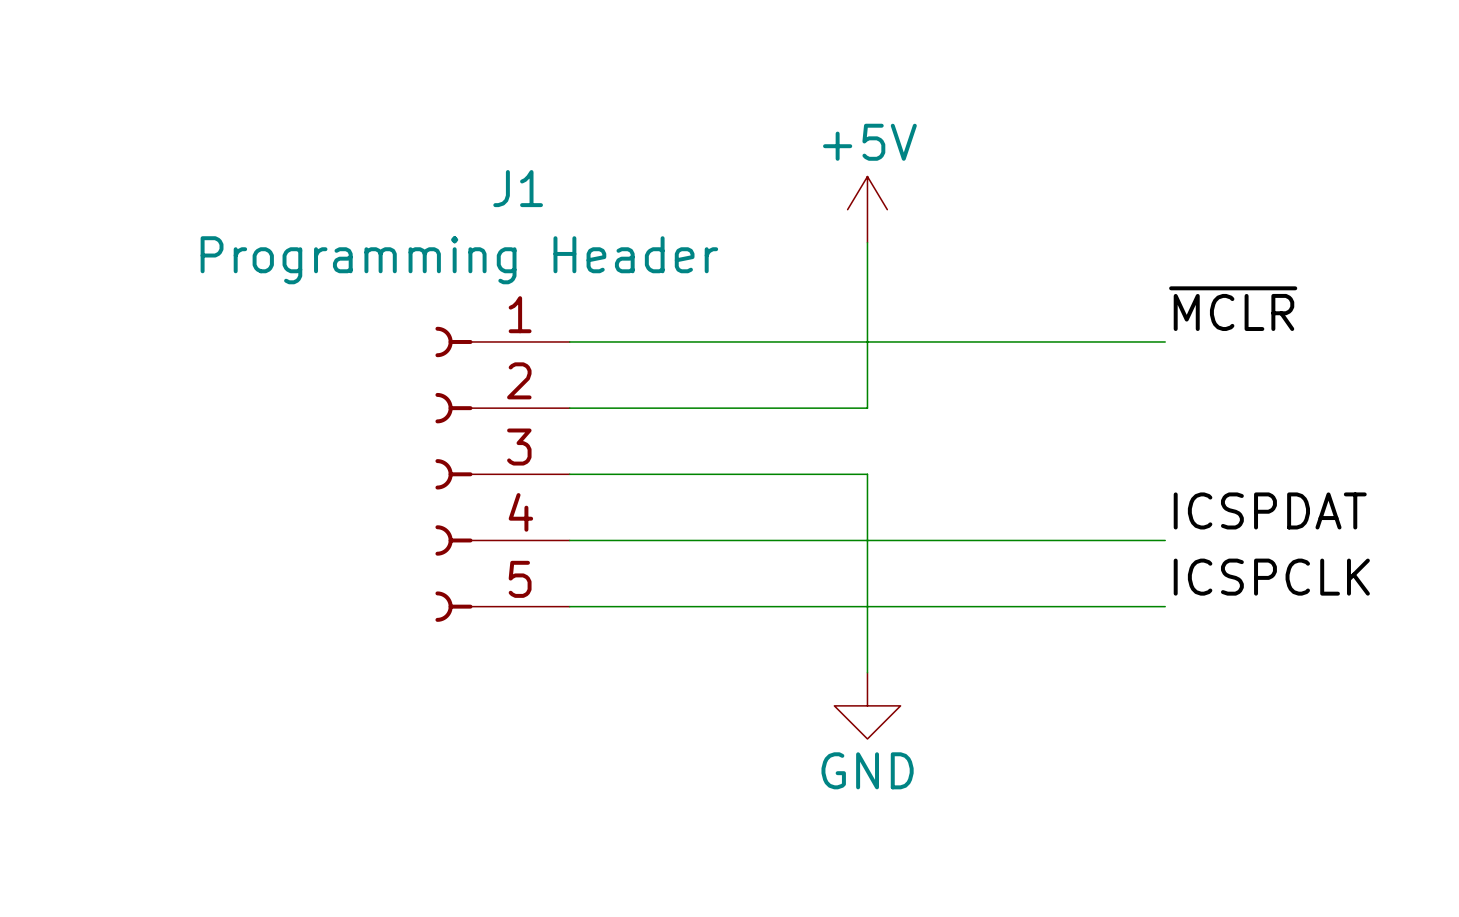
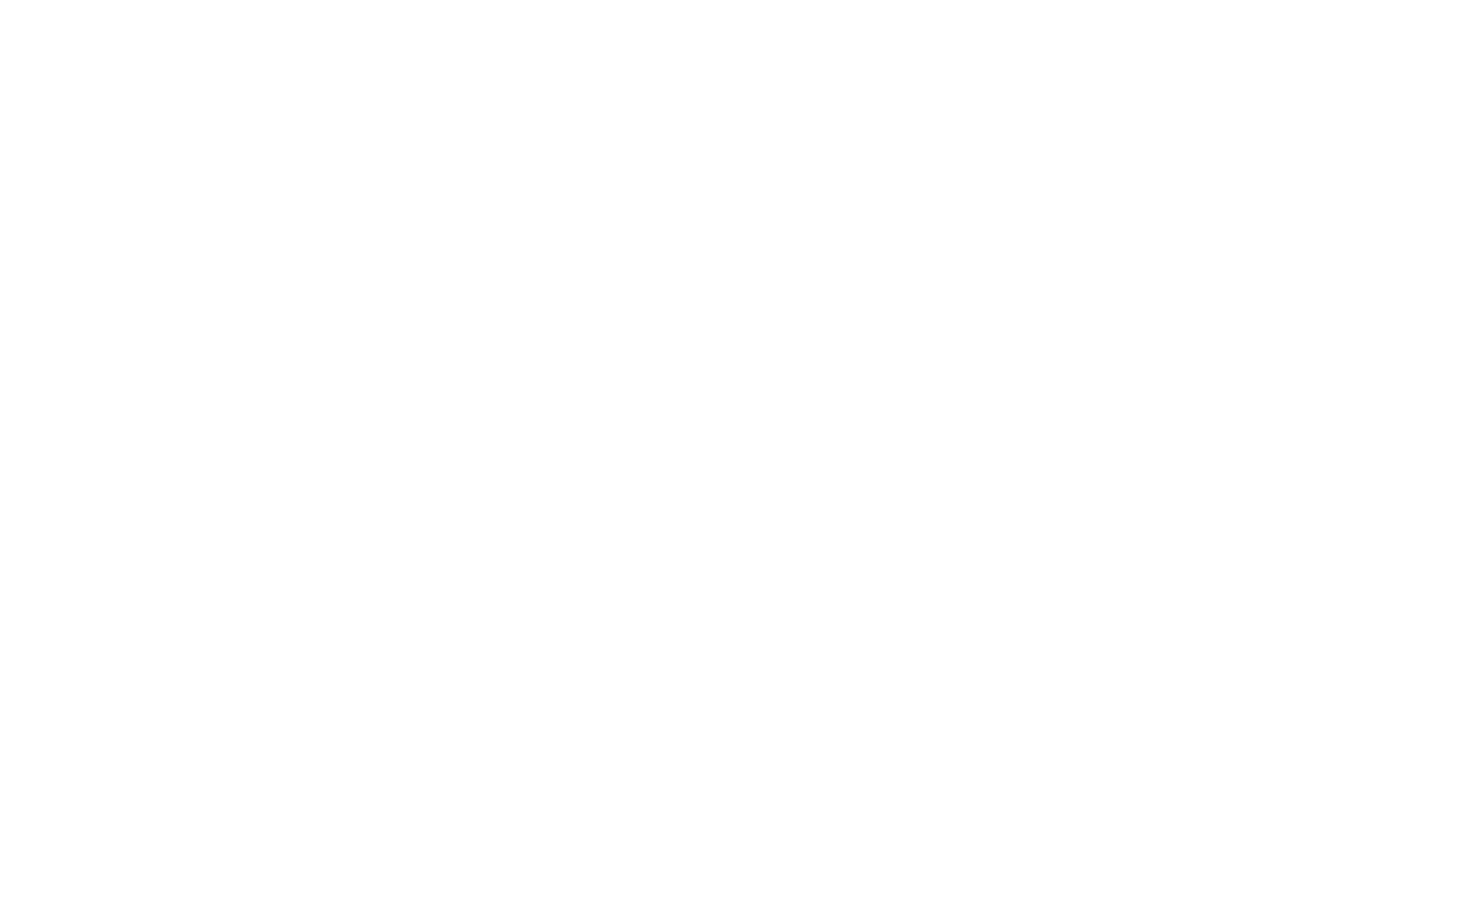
power symbol: +5V (867, 209) -> none
wire: (867, 242) (867, 408) (569, 408) -> none
label: ~{MCLR} (1233, 308) -> none
wire: (569, 341) (1165, 341) -> none
J1: Programming Header (502, 474) -> none
wire: (569, 474) (867, 474) (867, 672) -> none
label: ICSPDAT (1270, 510) -> none
wire: (569, 540) (1165, 540) -> none
label: ICSPCLK (1271, 577) -> none
wire: (569, 606) (1165, 606) -> none
power symbol: GND (867, 705) -> none

